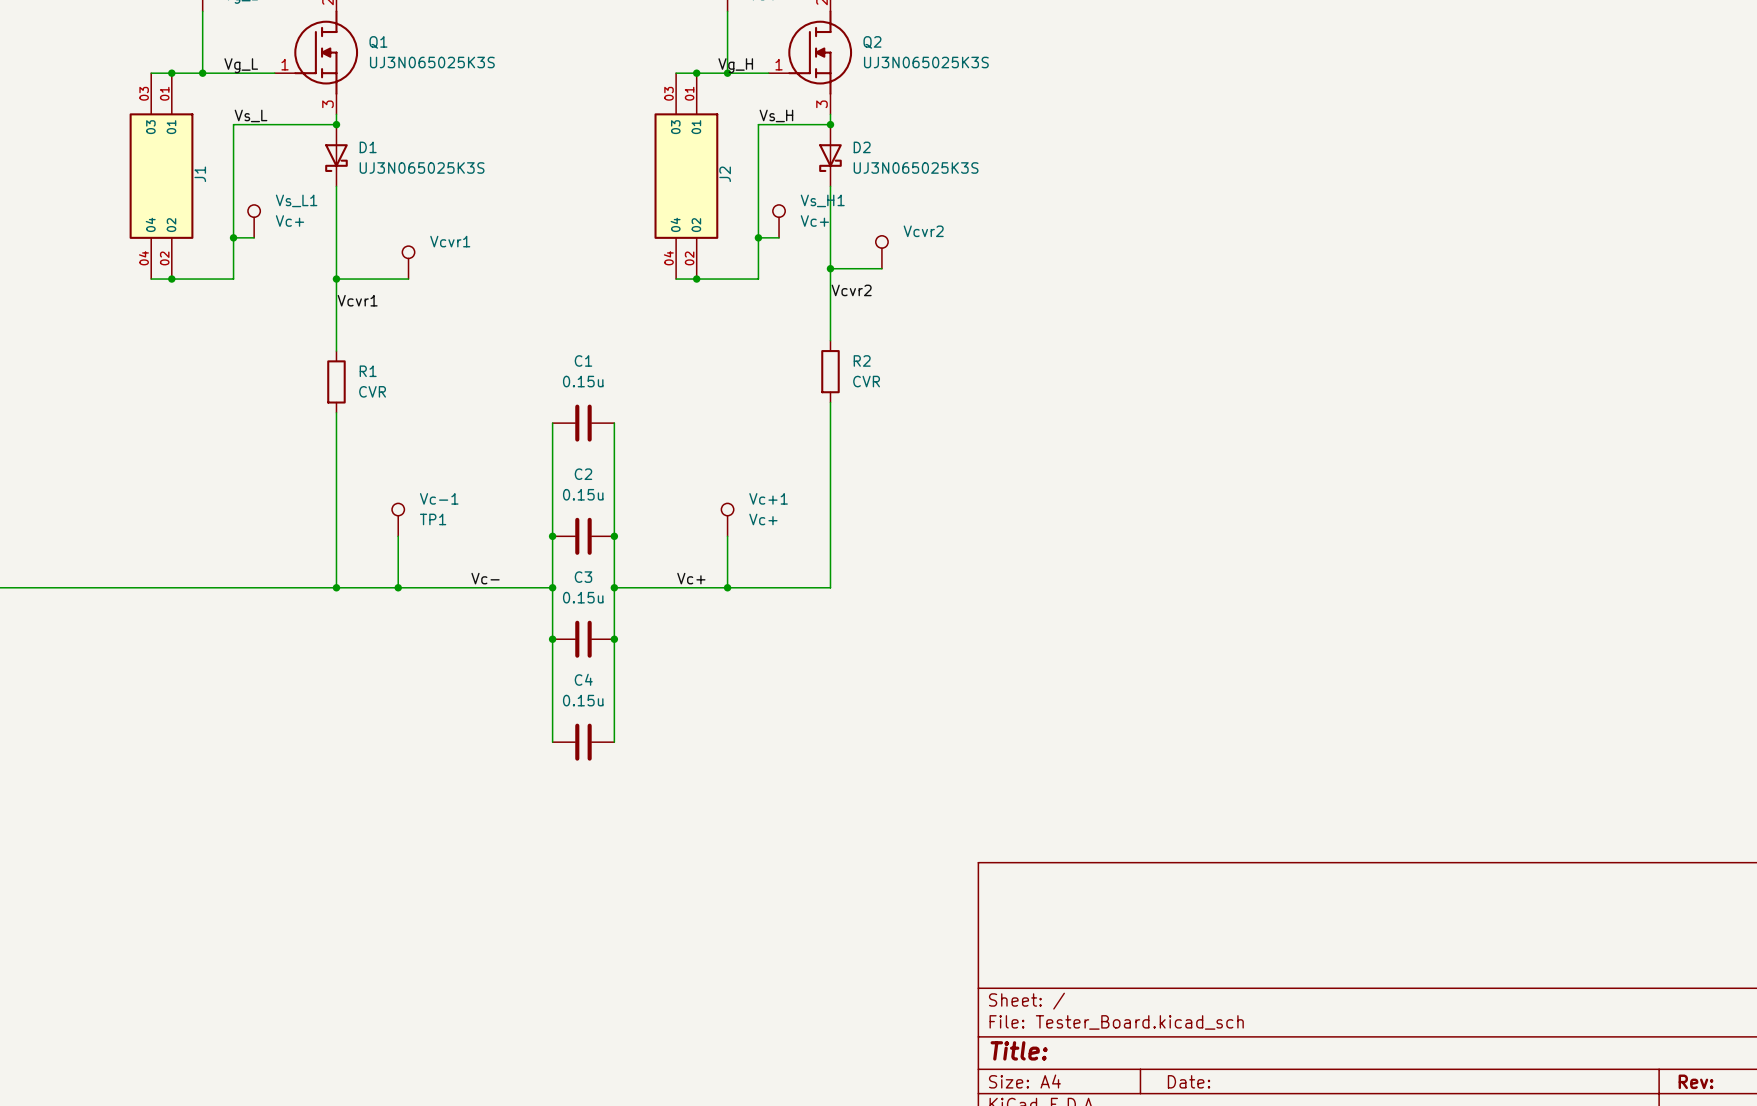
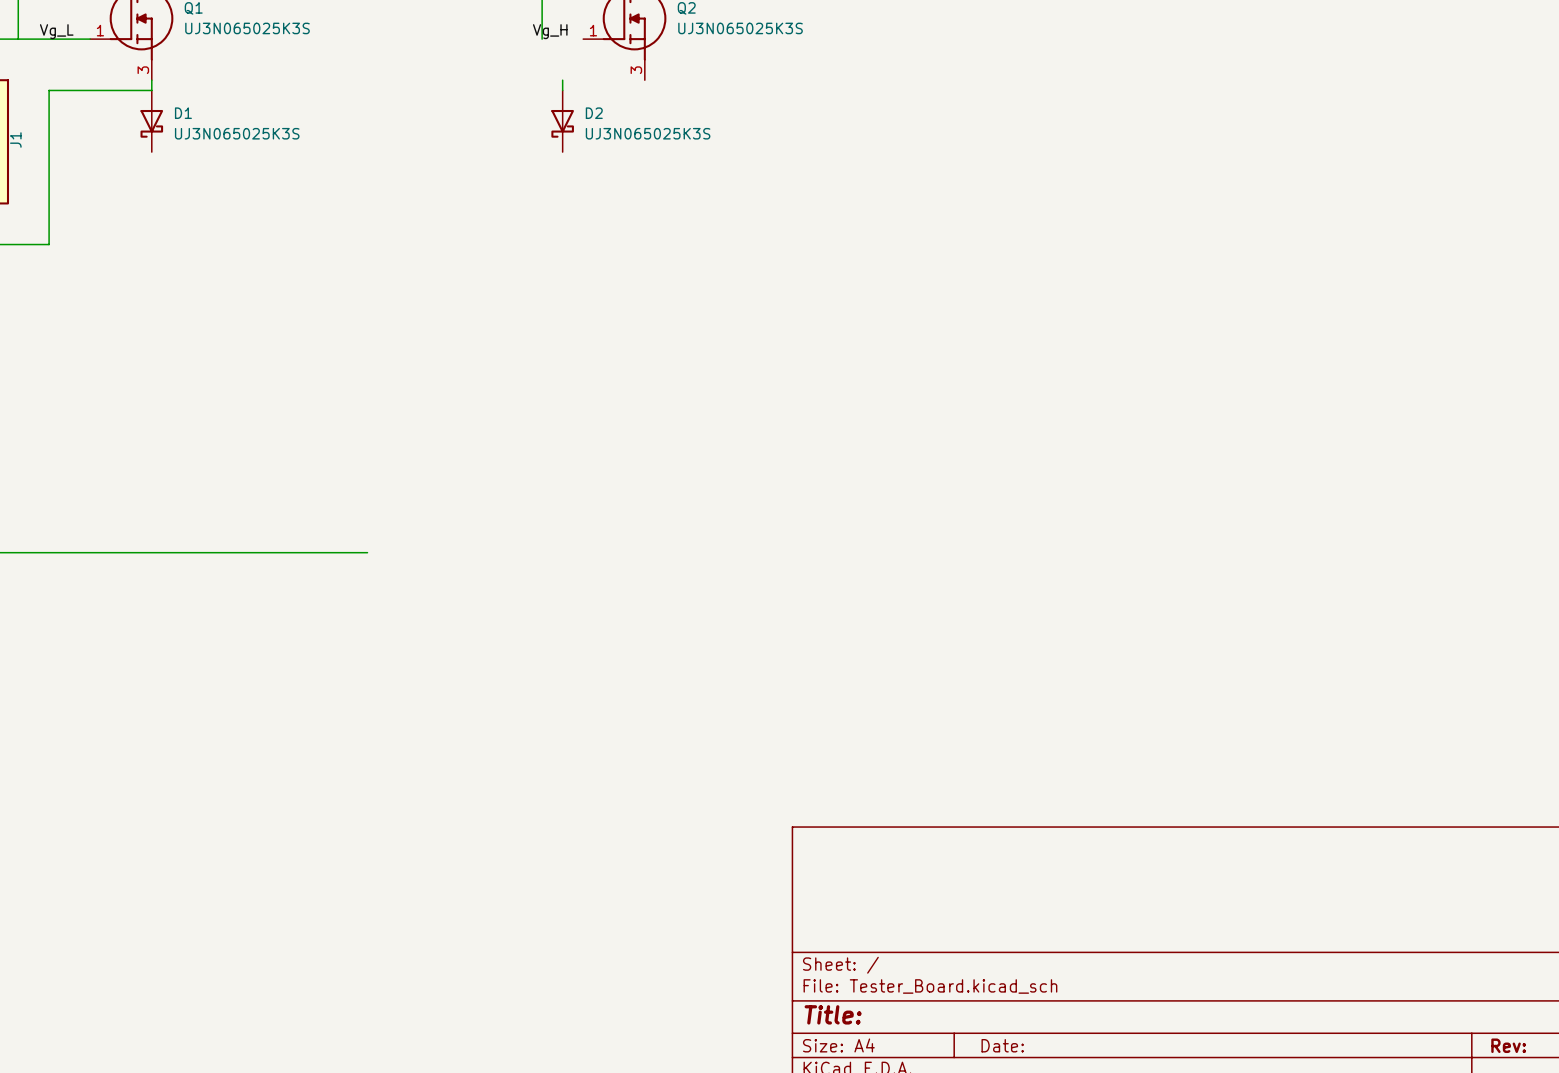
junction: (202, 73) -> none
wire: (676, 73) (768, 73) -> none
junction: (696, 73) -> none
junction: (727, 73) -> none
wire: none -> (562, 80) (562, 90)
wire: (830, 114) (830, 124) (758, 124) (758, 279) (676, 279) -> none
label: Vs_L (251, 115) -> none
label: Vs_H (776, 115) -> none
junction: (336, 124) -> none
junction: (830, 124) -> none
D2 position: (830, 155) -> (562, 121)
J2: (686, 176) -> none
wire: (336, 186) (336, 351) -> none
wire: (830, 186) (830, 340) -> none
Vs_L1: Vc+ (254, 221) -> none
Vs_H1: Vc+ (779, 221) -> none
wire: (233, 237) (254, 237) -> none
junction: (233, 237) -> none
wire: (758, 237) (779, 237) -> none
junction: (758, 237) -> none
Vcvr2: (881, 252) -> none
Vcvr1: (408, 262) -> none
wire: (830, 268) (881, 268) -> none
junction: (830, 268) -> none
wire: (336, 279) (408, 279) -> none
junction: (336, 279) -> none
junction: (696, 279) -> none
label: Vcvr2 (851, 290) -> none
label: Vcvr1 (357, 300) -> none
R2: CVR (830, 371) -> none
R1: CVR (336, 381) -> none
wire: (830, 402) (830, 587) (614, 587) -> none
wire: (336, 412) (336, 587) -> none
wire: (552, 423) (552, 742) -> none
C1: 0.15u (583, 423) -> none
wire: (614, 423) (614, 742) -> none
Vc-1: TP1 (398, 519) -> none
Vc+1: Vc+ (727, 519) -> none
wire: (398, 536) (398, 587) -> none
junction: (552, 536) -> none
C2: 0.15u (583, 536) -> none
junction: (614, 536) -> none
wire: (727, 536) (727, 587) -> none
label: Vc- (485, 578) -> none
label: Vc+ (691, 578) -> none
junction: (336, 587) -> none
junction: (398, 587) -> none
junction: (552, 587) -> none
junction: (614, 587) -> none
junction: (727, 587) -> none
junction: (552, 639) -> none
C3: 0.15u (583, 639) -> none
junction: (614, 639) -> none
C4: 0.15u (583, 742) -> none

